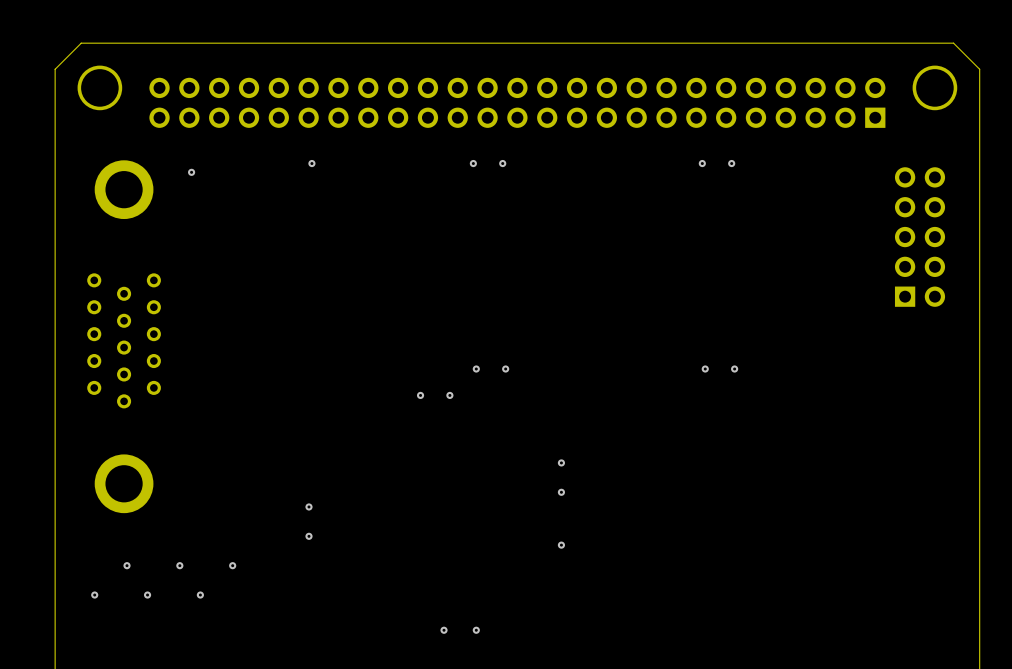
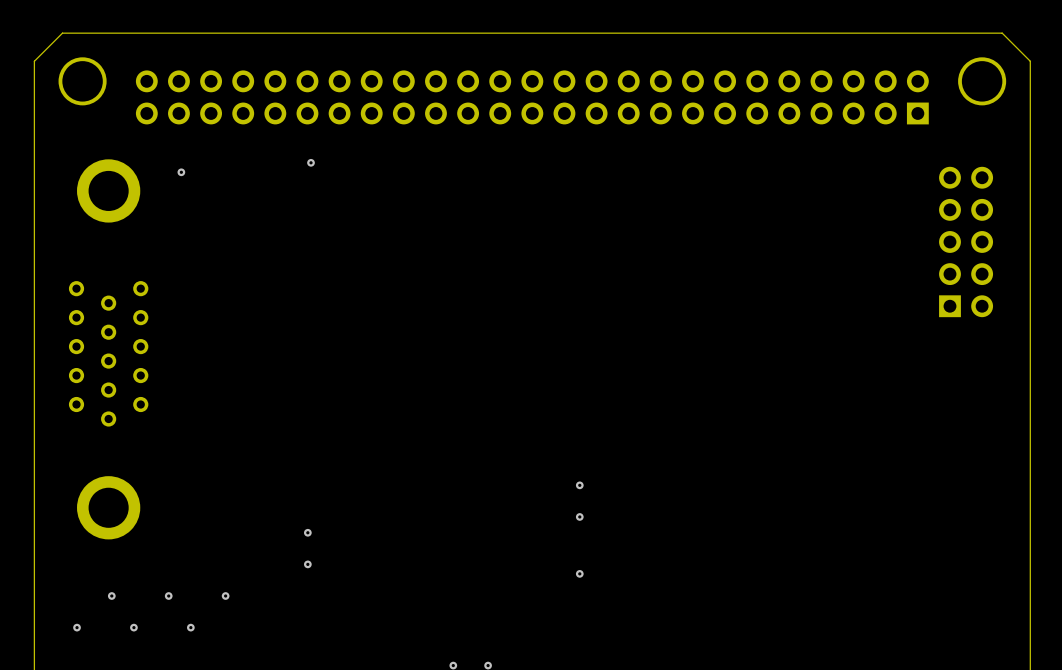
via: (473, 163) -> none
via: (502, 163) -> none
via: (702, 163) -> none
via: (731, 163) -> none
via: (476, 369) -> none
via: (505, 369) -> none
via: (705, 369) -> none
via: (734, 369) -> none
via: (420, 395) -> none
via: (449, 395) -> none

